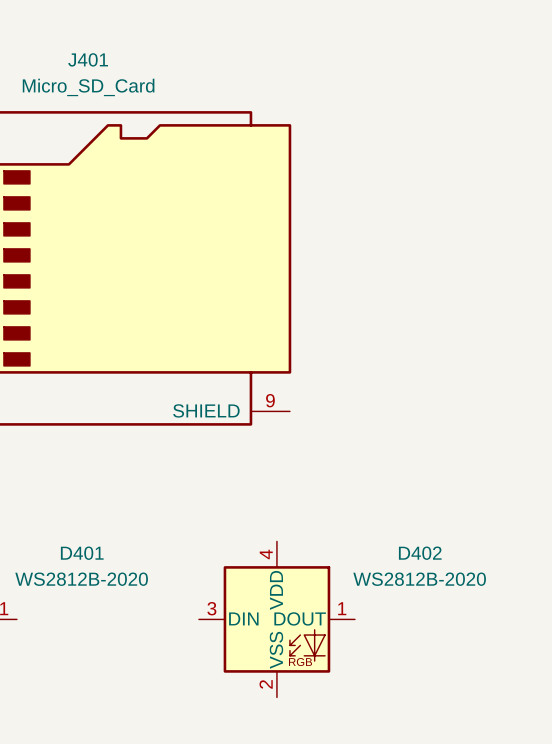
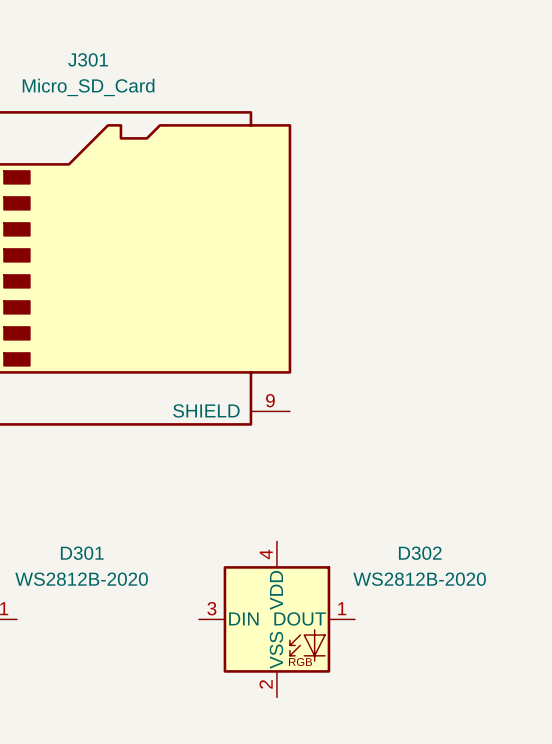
J401 name: J401 (88, 59) -> J301 (88, 59)
D401 name: D401 (82, 553) -> D301 (82, 553)
D402 name: D402 (420, 553) -> D302 (420, 553)

